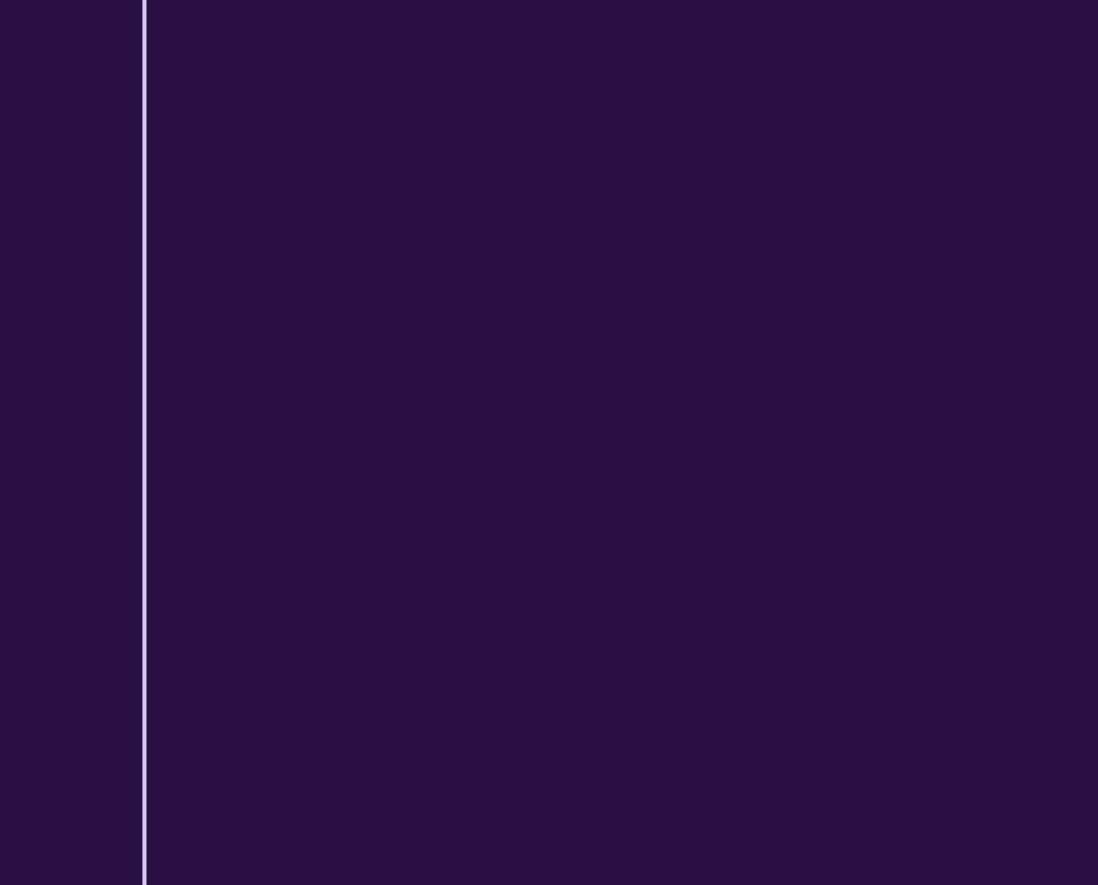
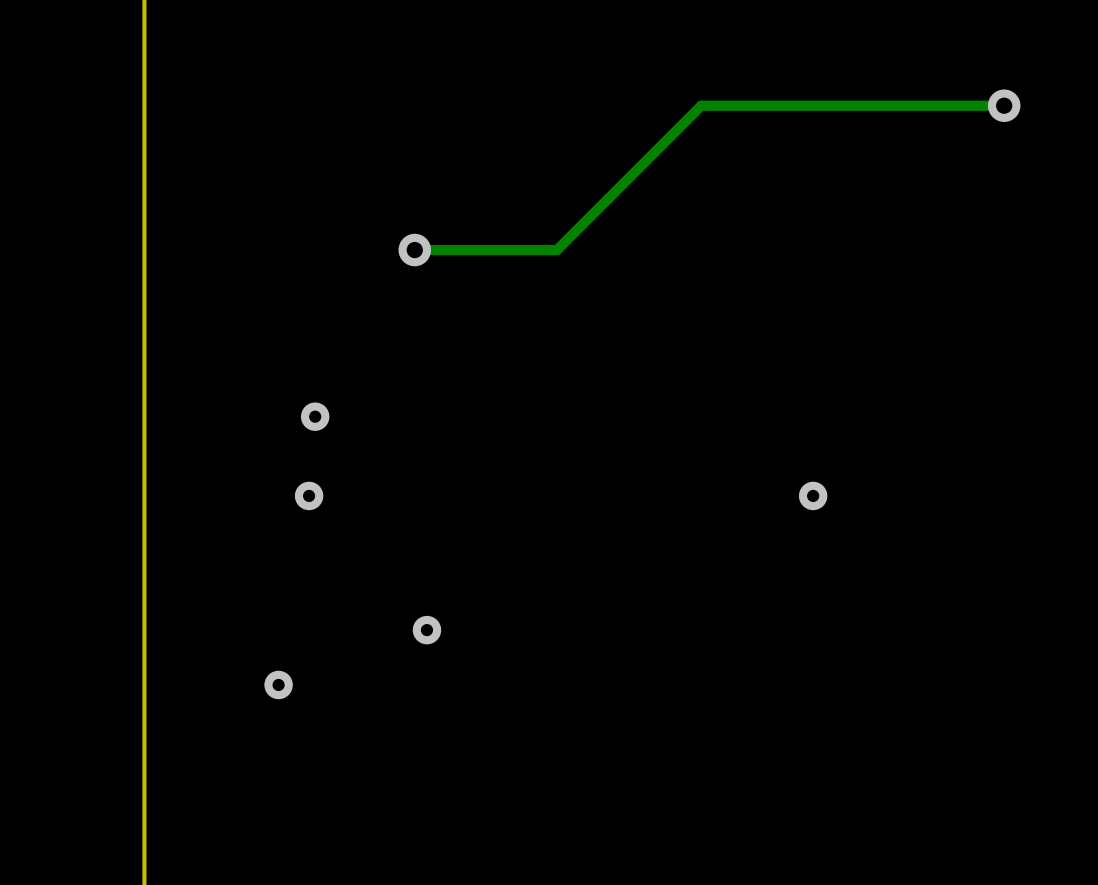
track: none -> (1004, 105) (701, 105) (557, 250) (414, 250)
via: none -> (1004, 105)
via: none -> (414, 250)
via: none -> (315, 416)
via: none -> (309, 495)
via: none -> (813, 495)
via: none -> (426, 630)
via: none -> (278, 684)

